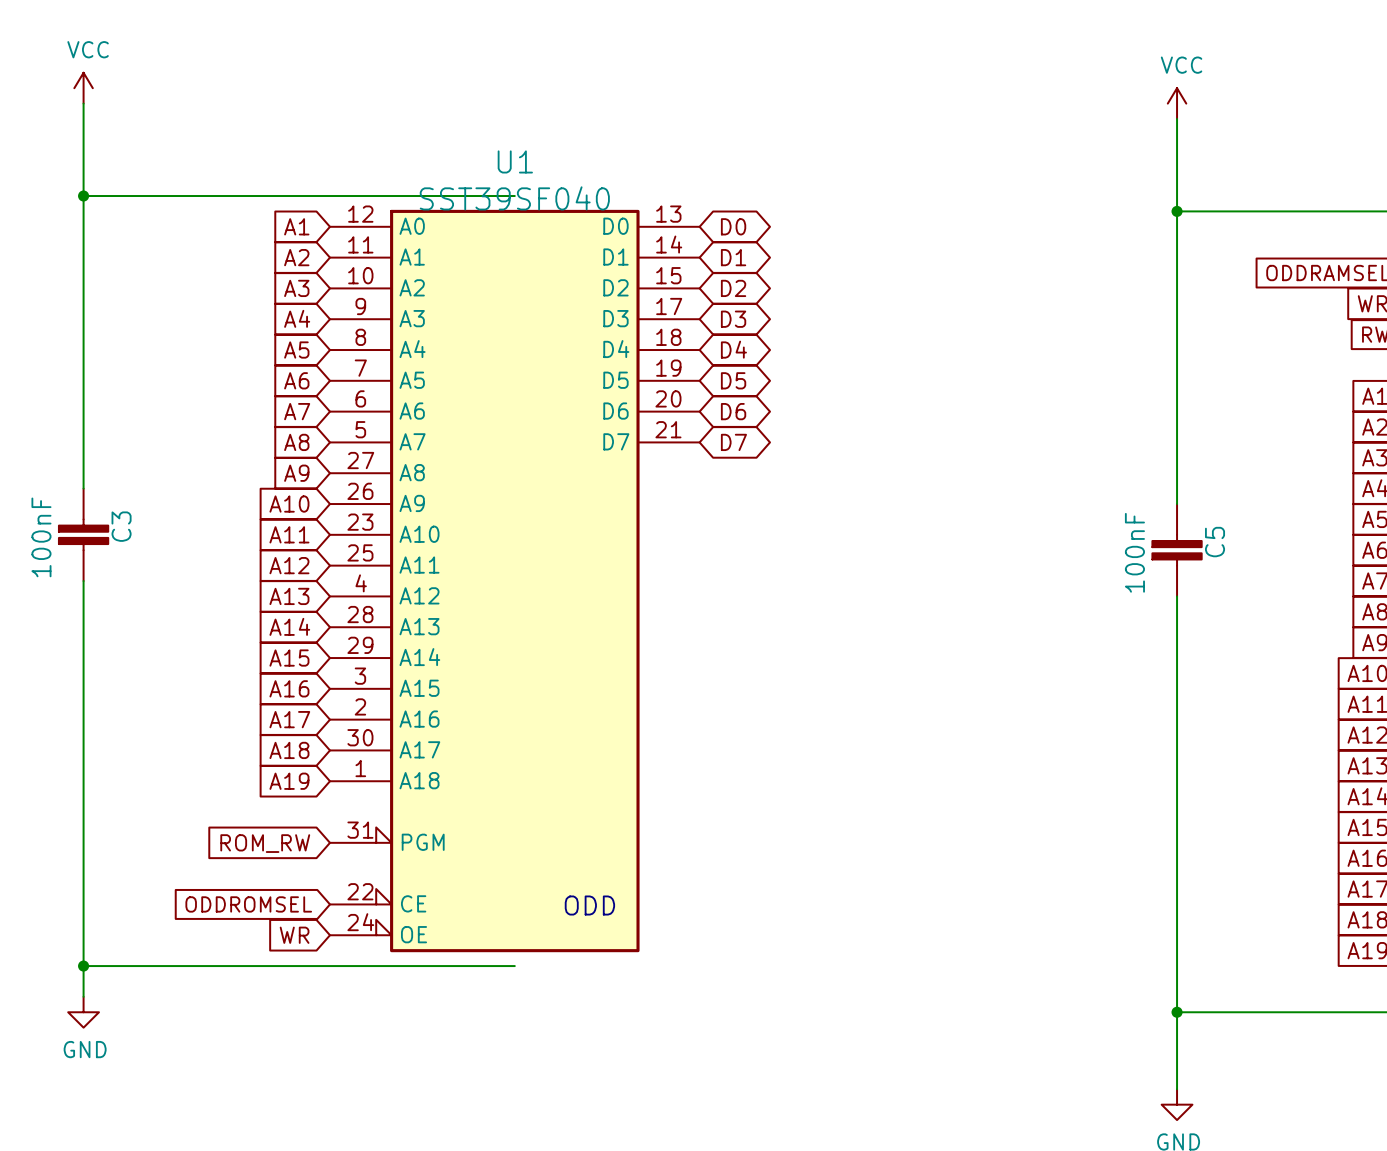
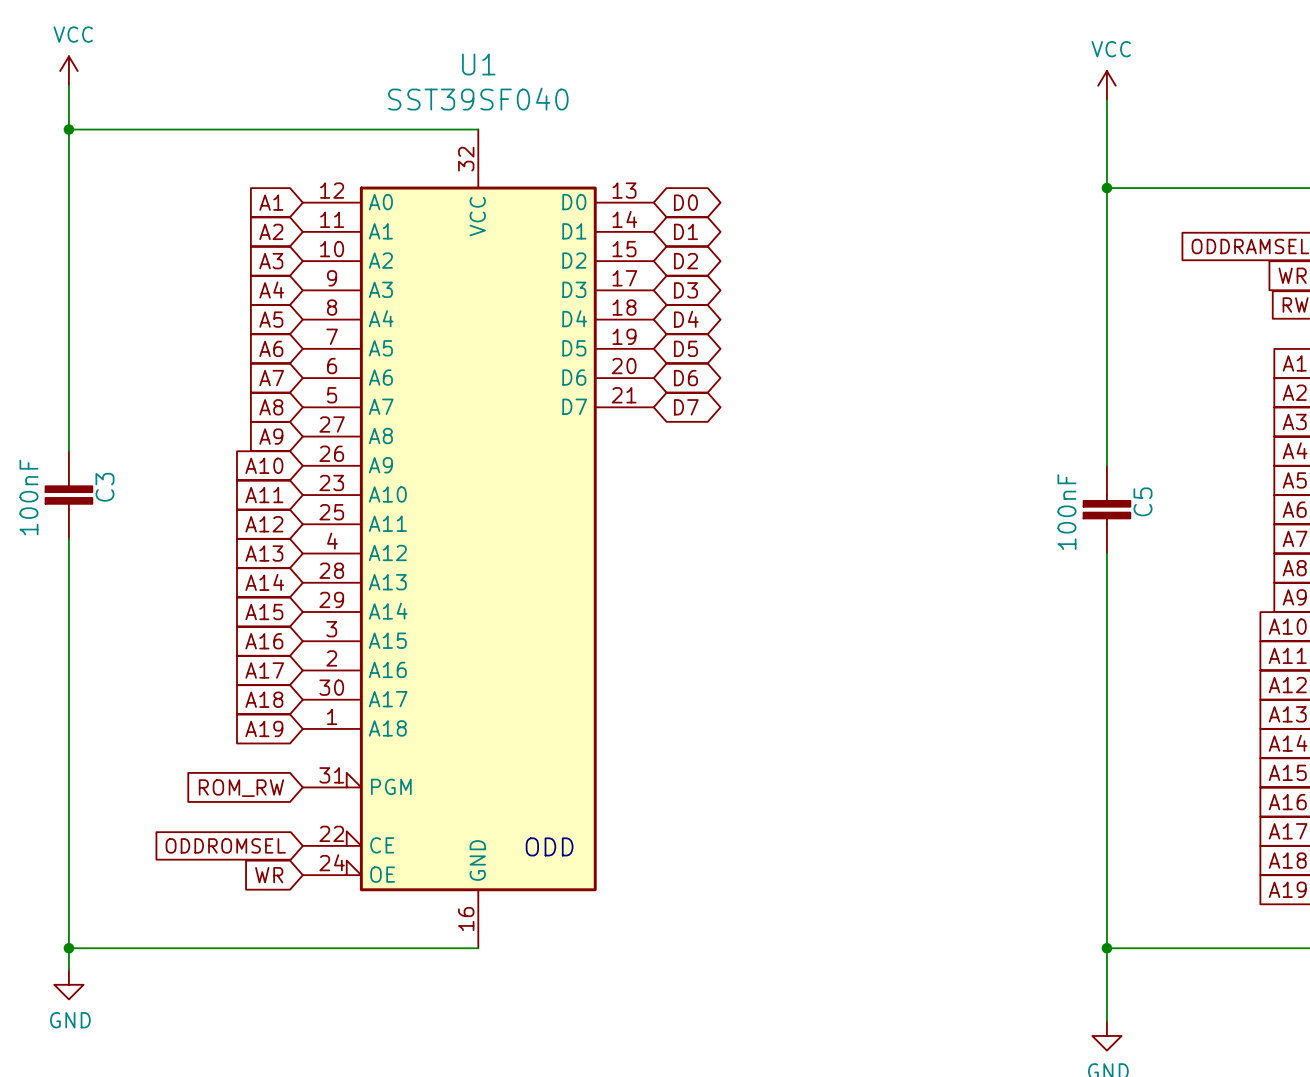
U1 name position: U1 (515, 161) -> U1 (478, 64)
wire: (83, 196) (514, 196) -> (68, 129) (478, 129)
junction position: (83, 196) -> (68, 129)
U1 value position: SST39SF040 (514, 198) -> SST39SF040 (478, 99)
U1 symbol: [329, 209, 700, 953] -> [302, 129, 654, 949]
wire: (83, 966) (514, 966) -> (68, 948) (478, 948)
junction position: (83, 966) -> (68, 948)
wire: none -> (68, 933) (68, 970)
power symbol position: GND (83, 1012) -> GND (68, 984)

